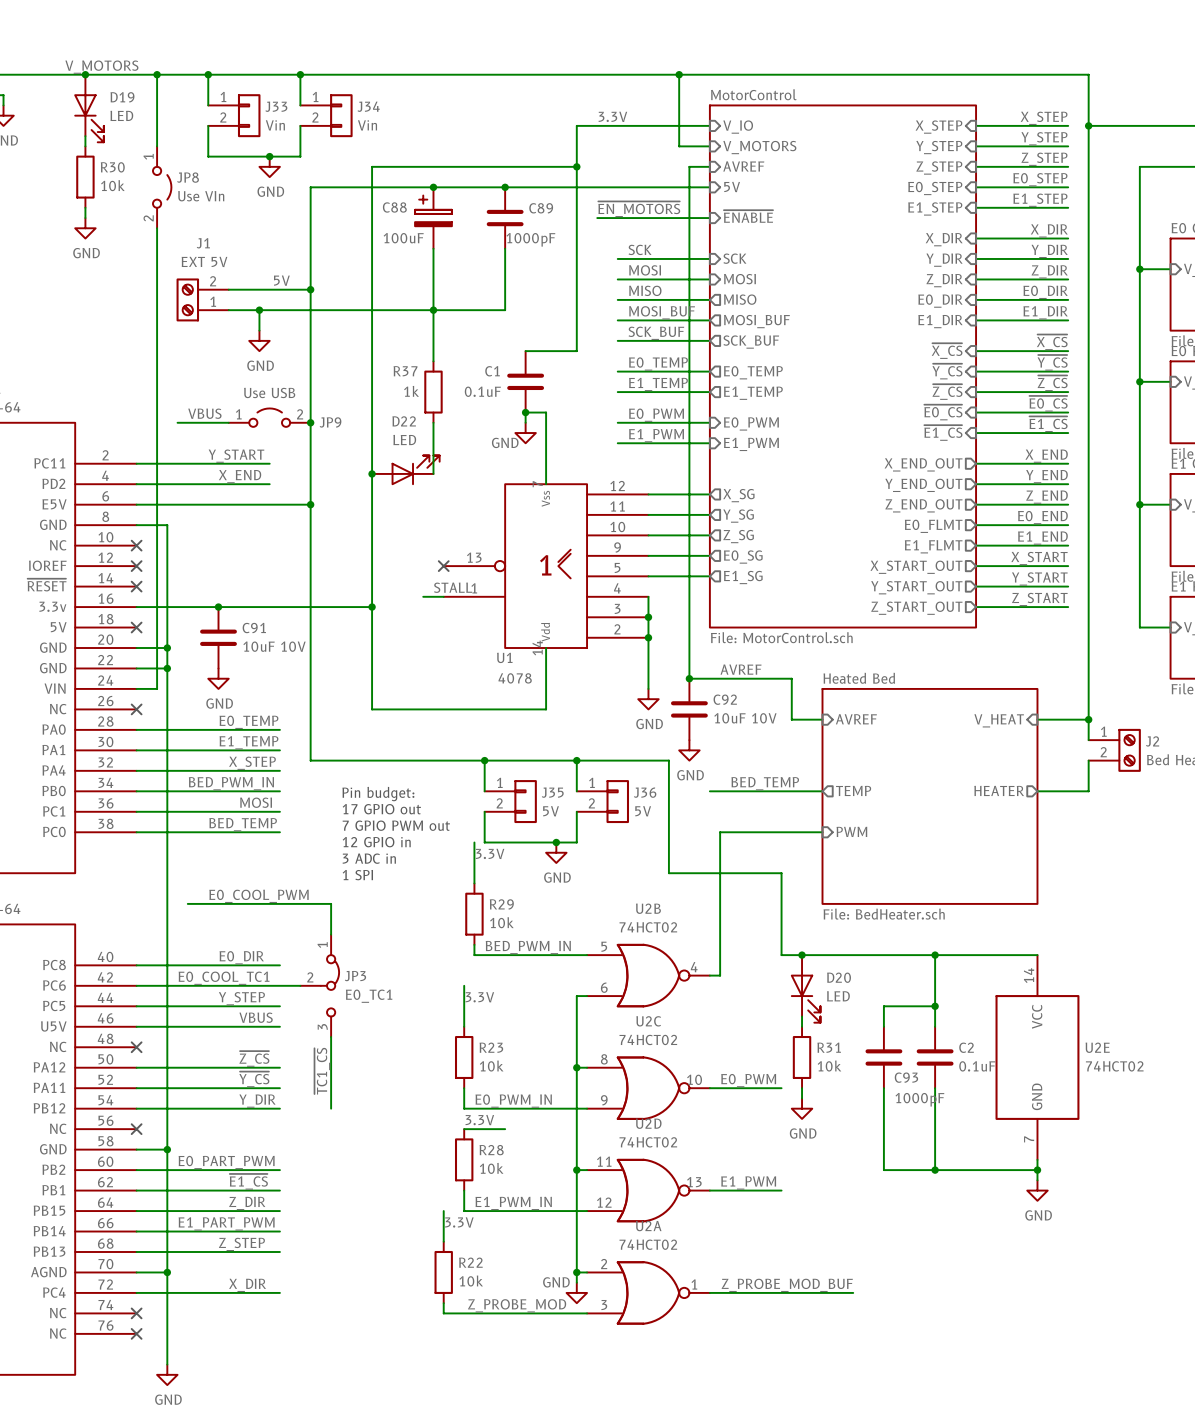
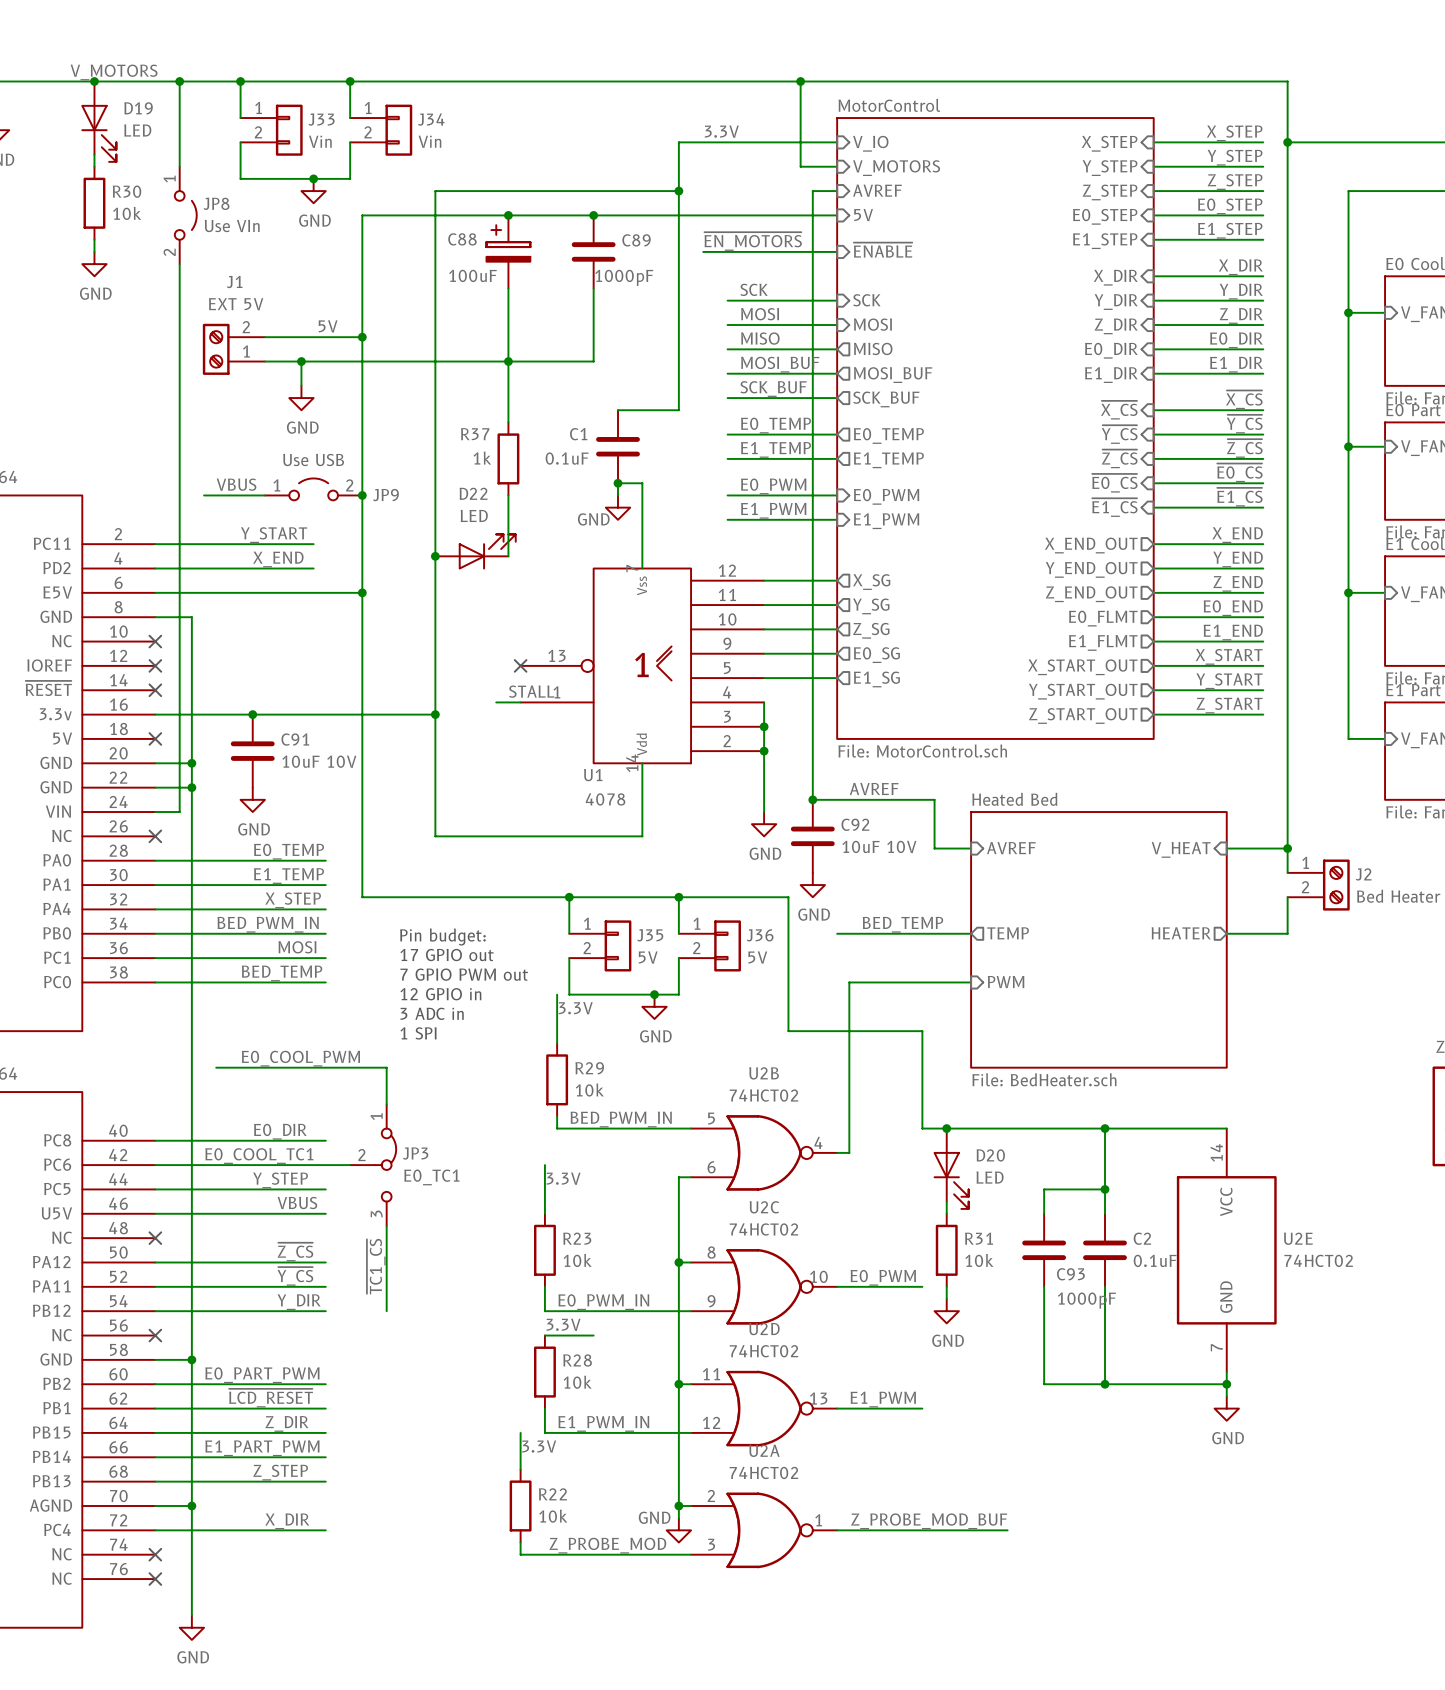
label: none -> ~{LCD_RESET} (271, 1398)
label: ~{E1_CS} (248, 1181) -> none

